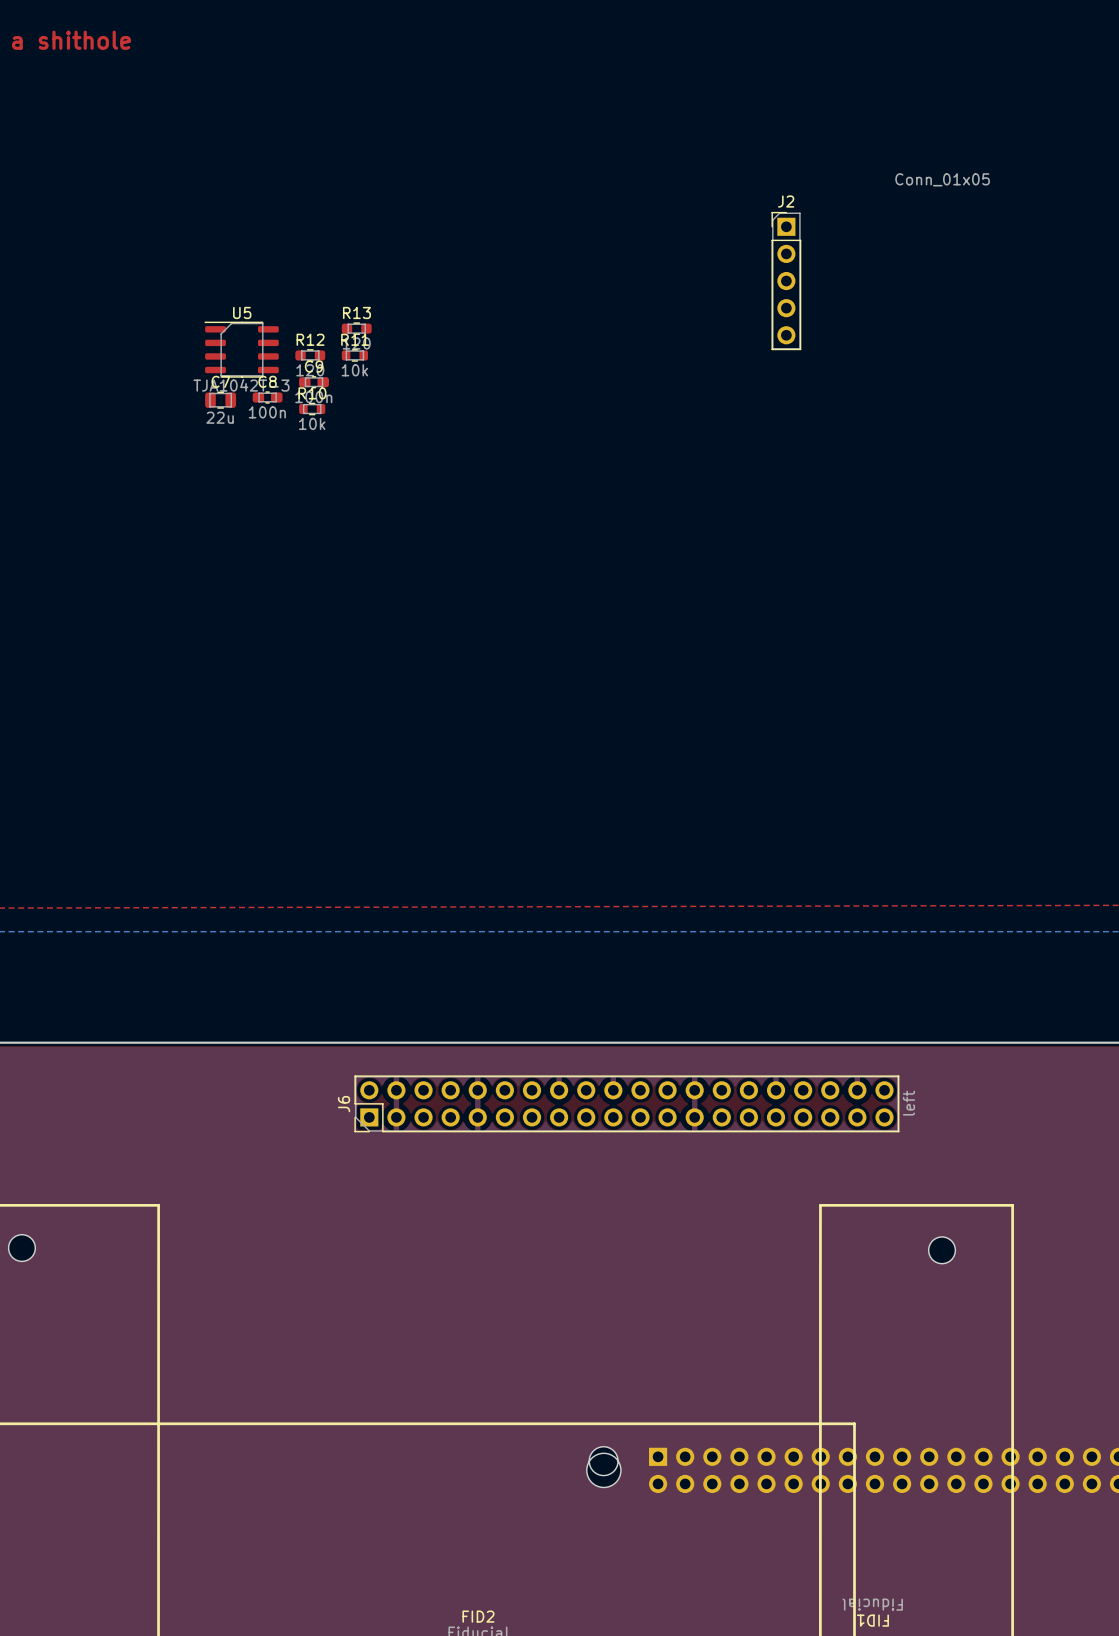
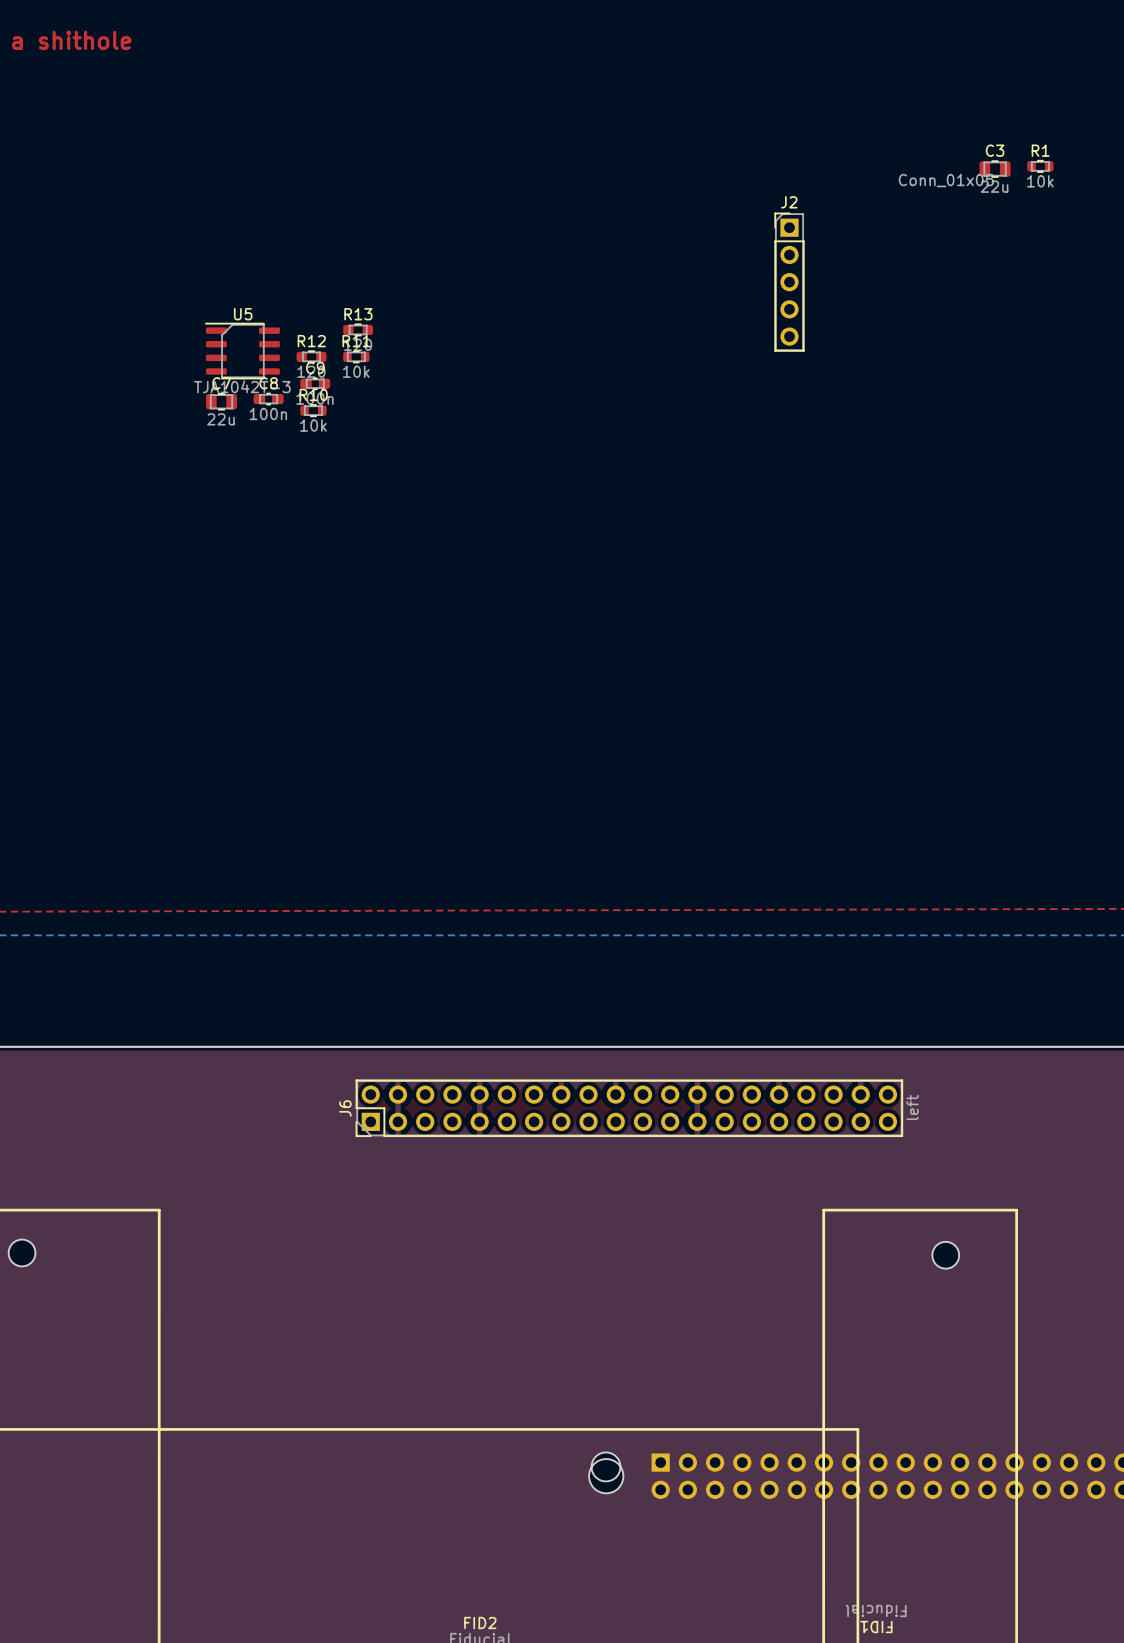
R1: none -> 10k (1040, 166)
C3: none -> 22u (995, 169)

